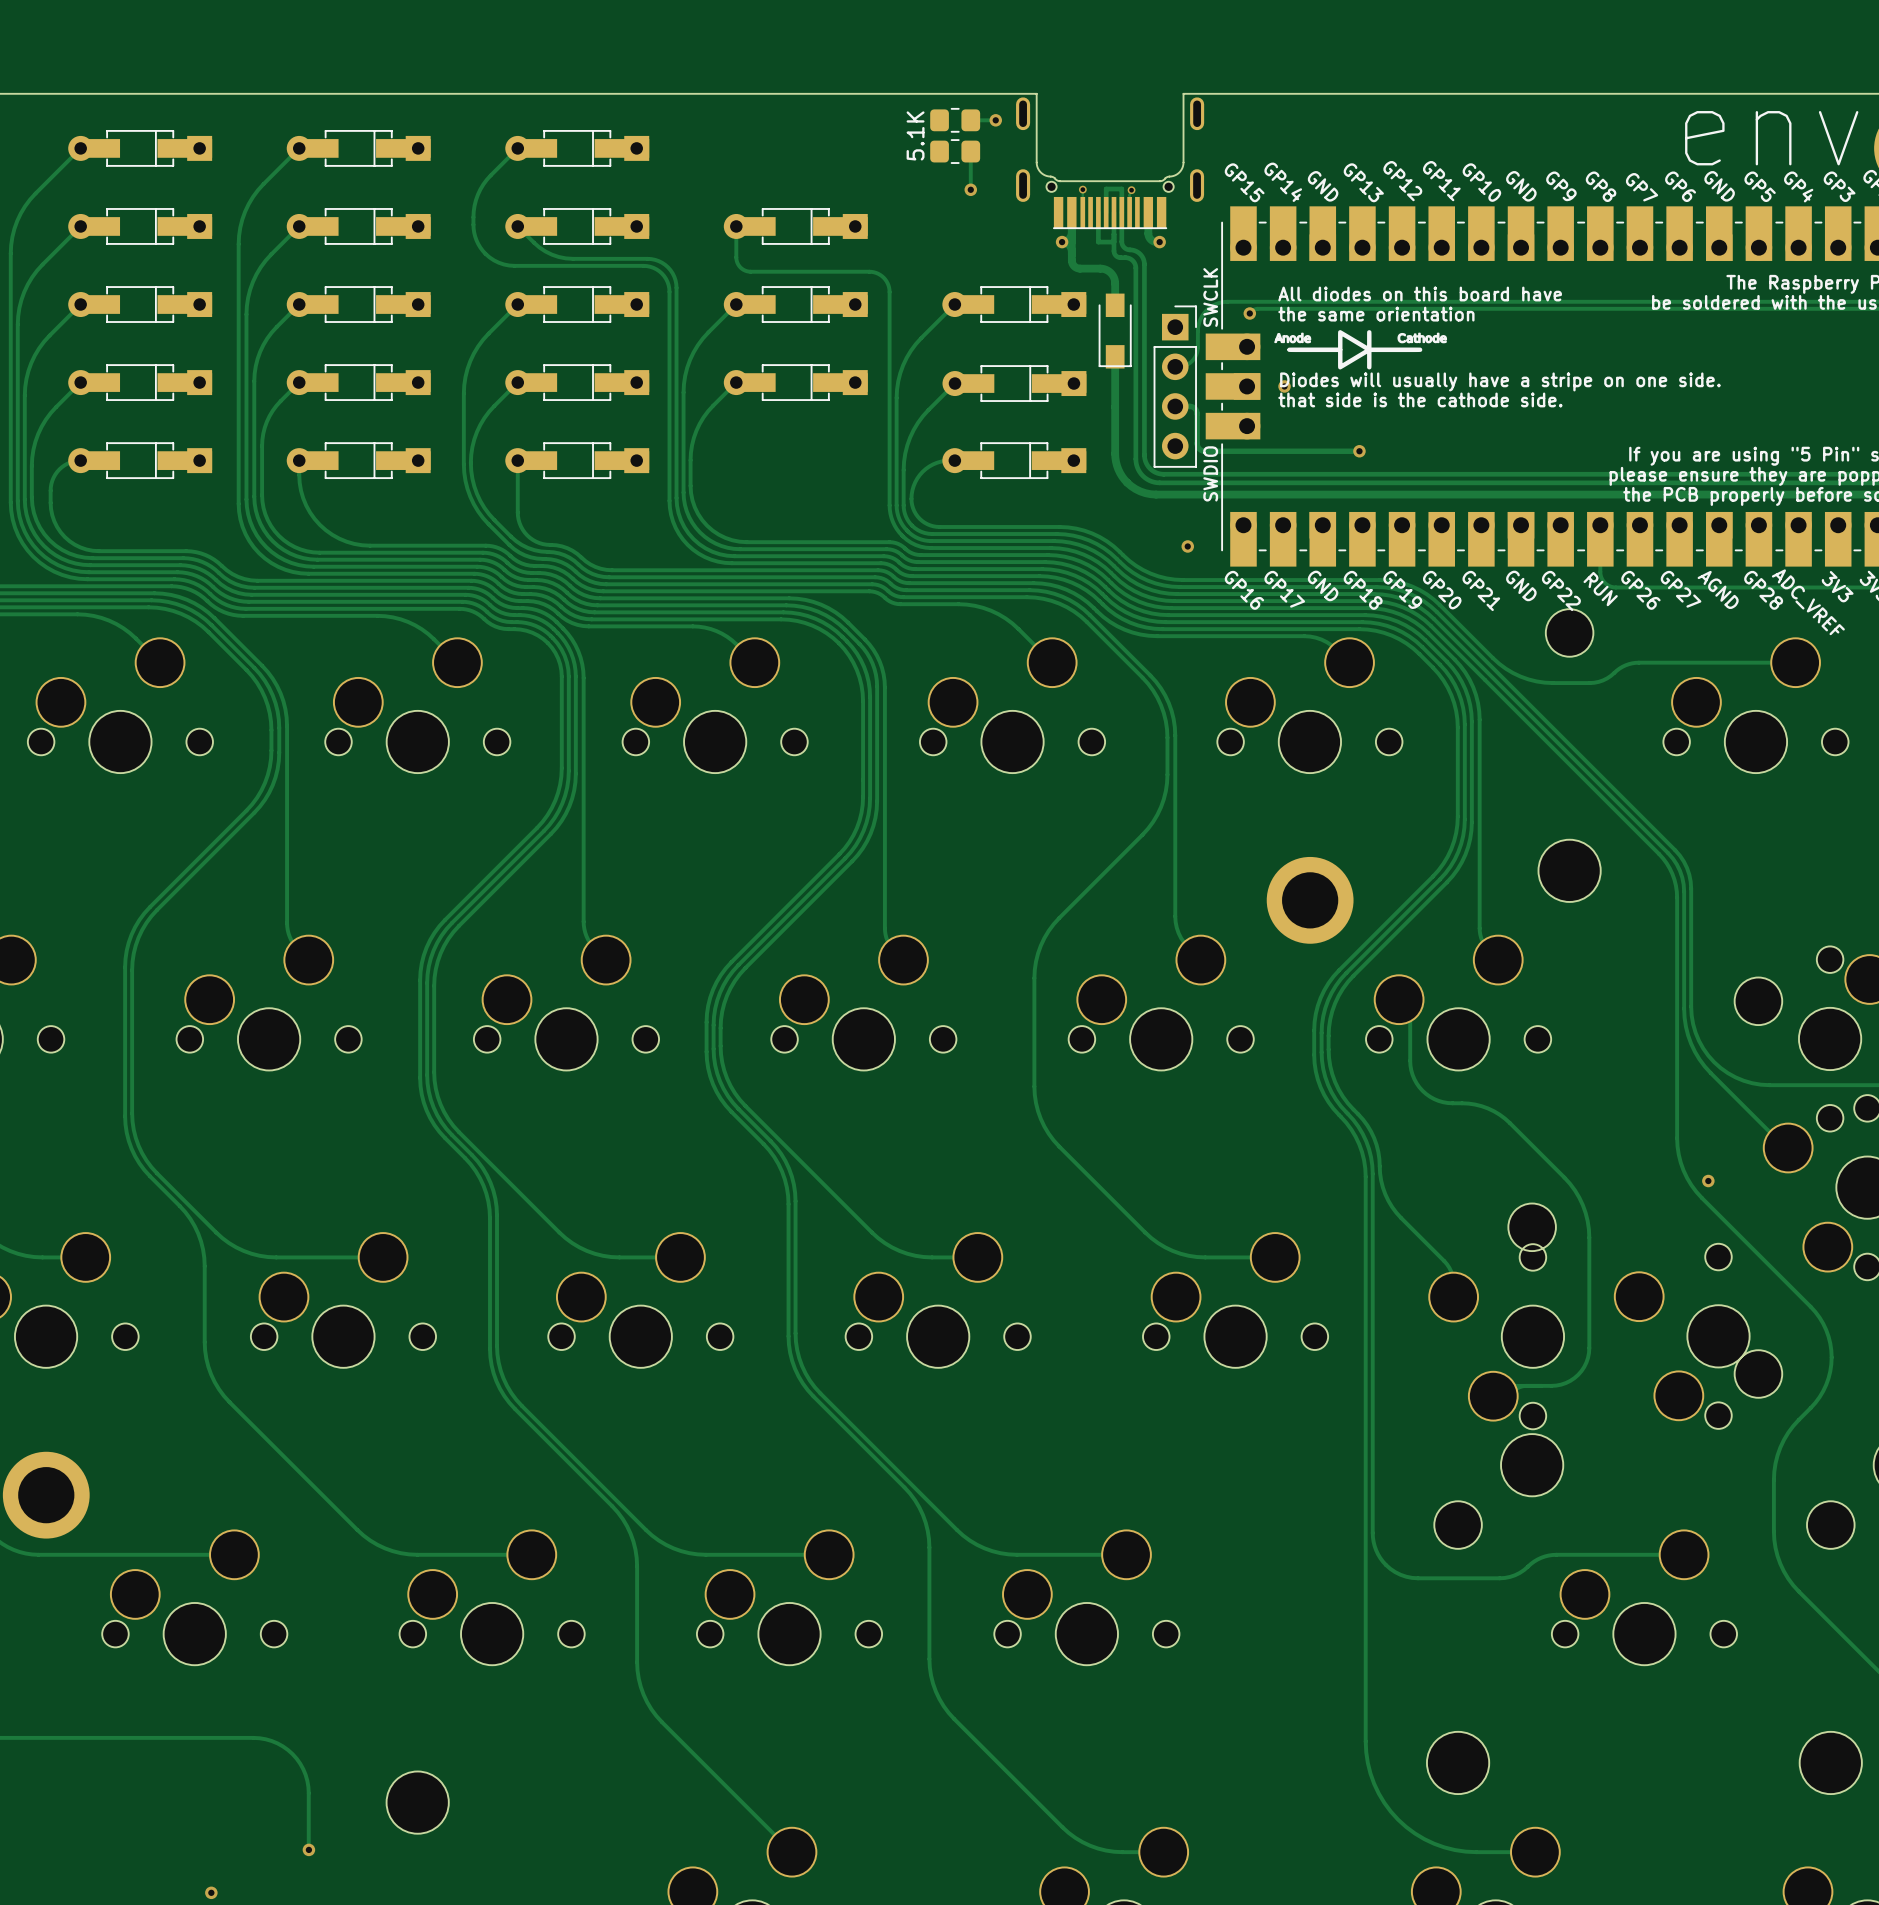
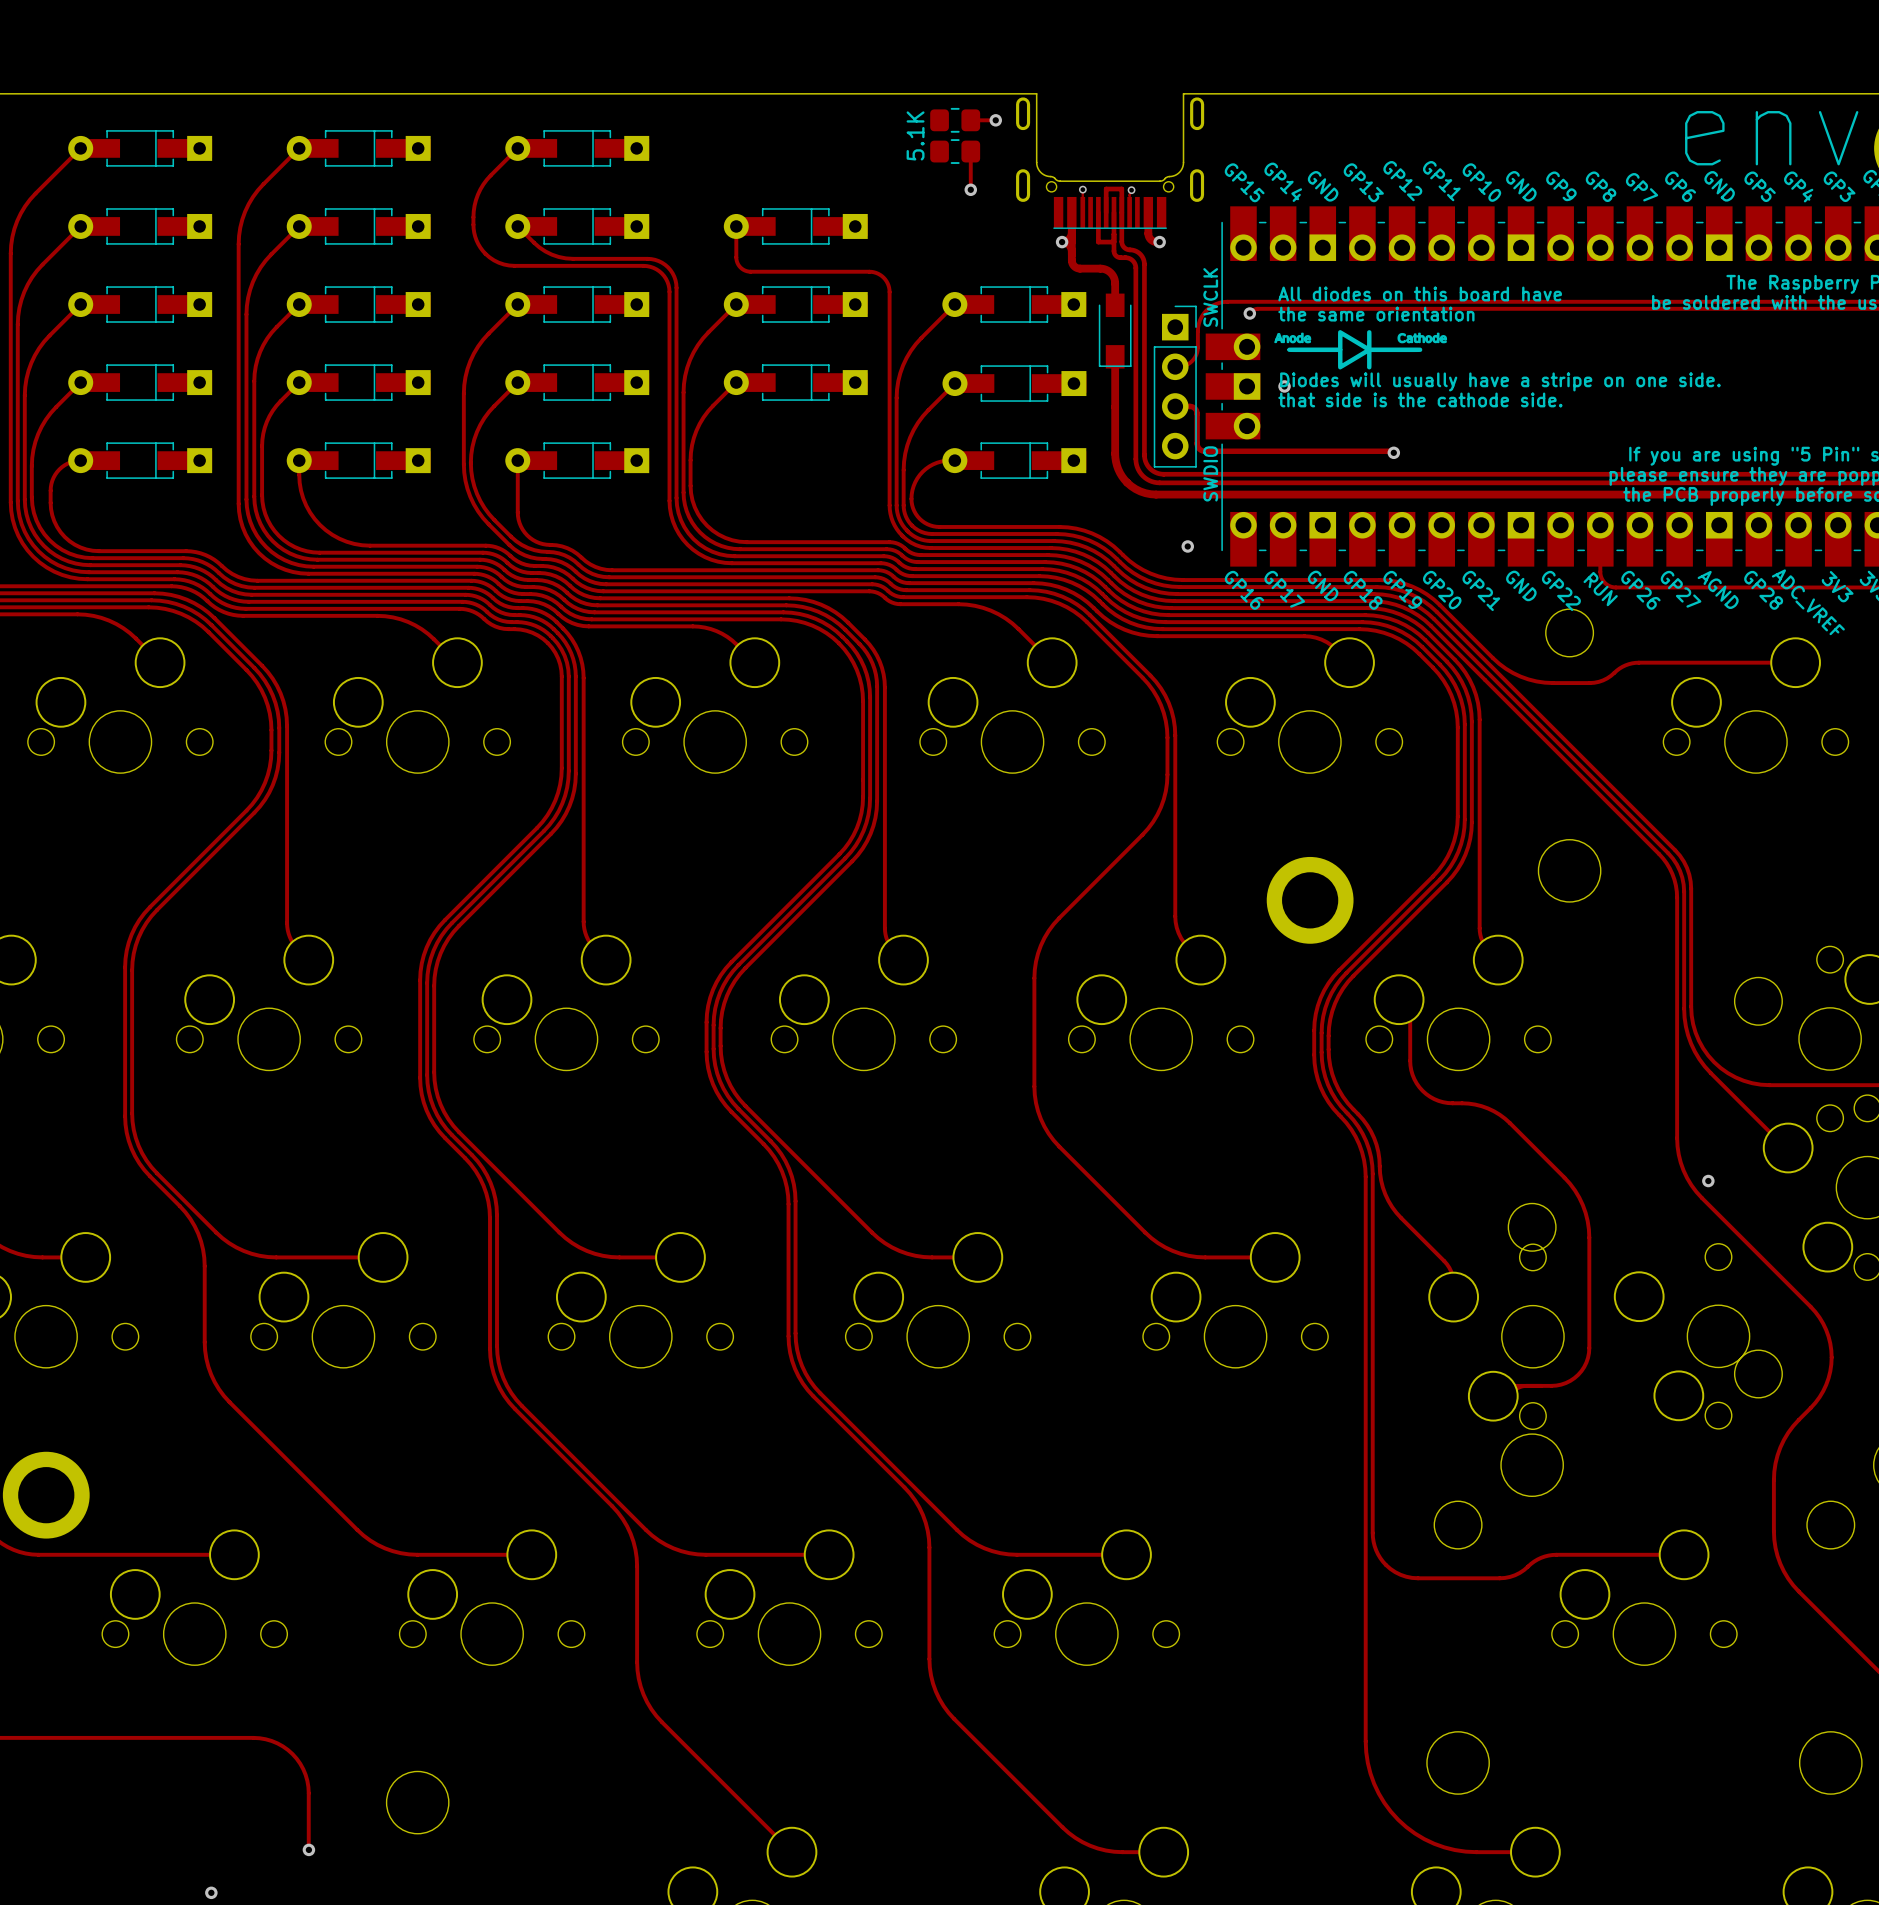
track: none -> (1359, 451) (1393, 452)
via position: (1359, 451) -> (1393, 452)

